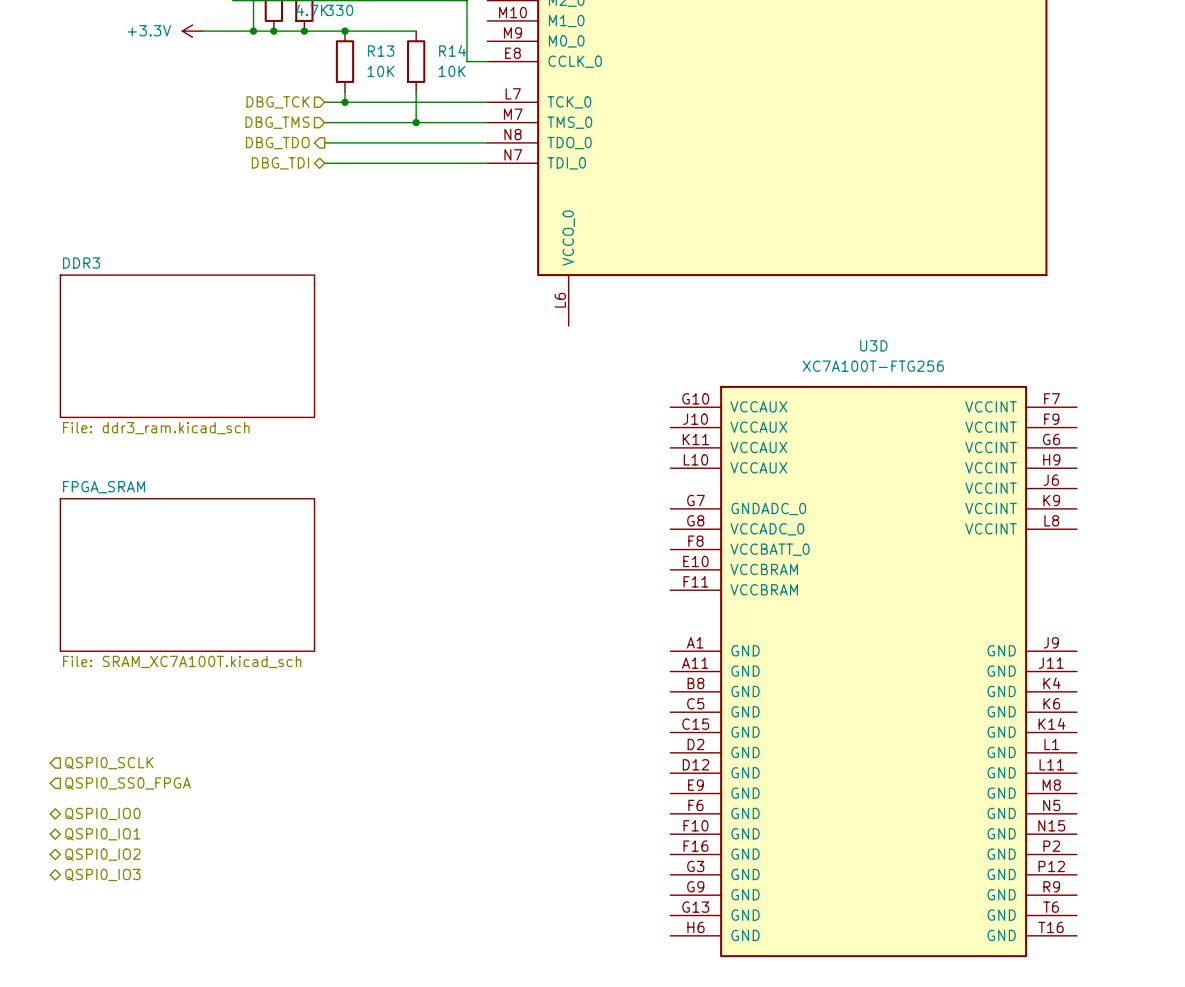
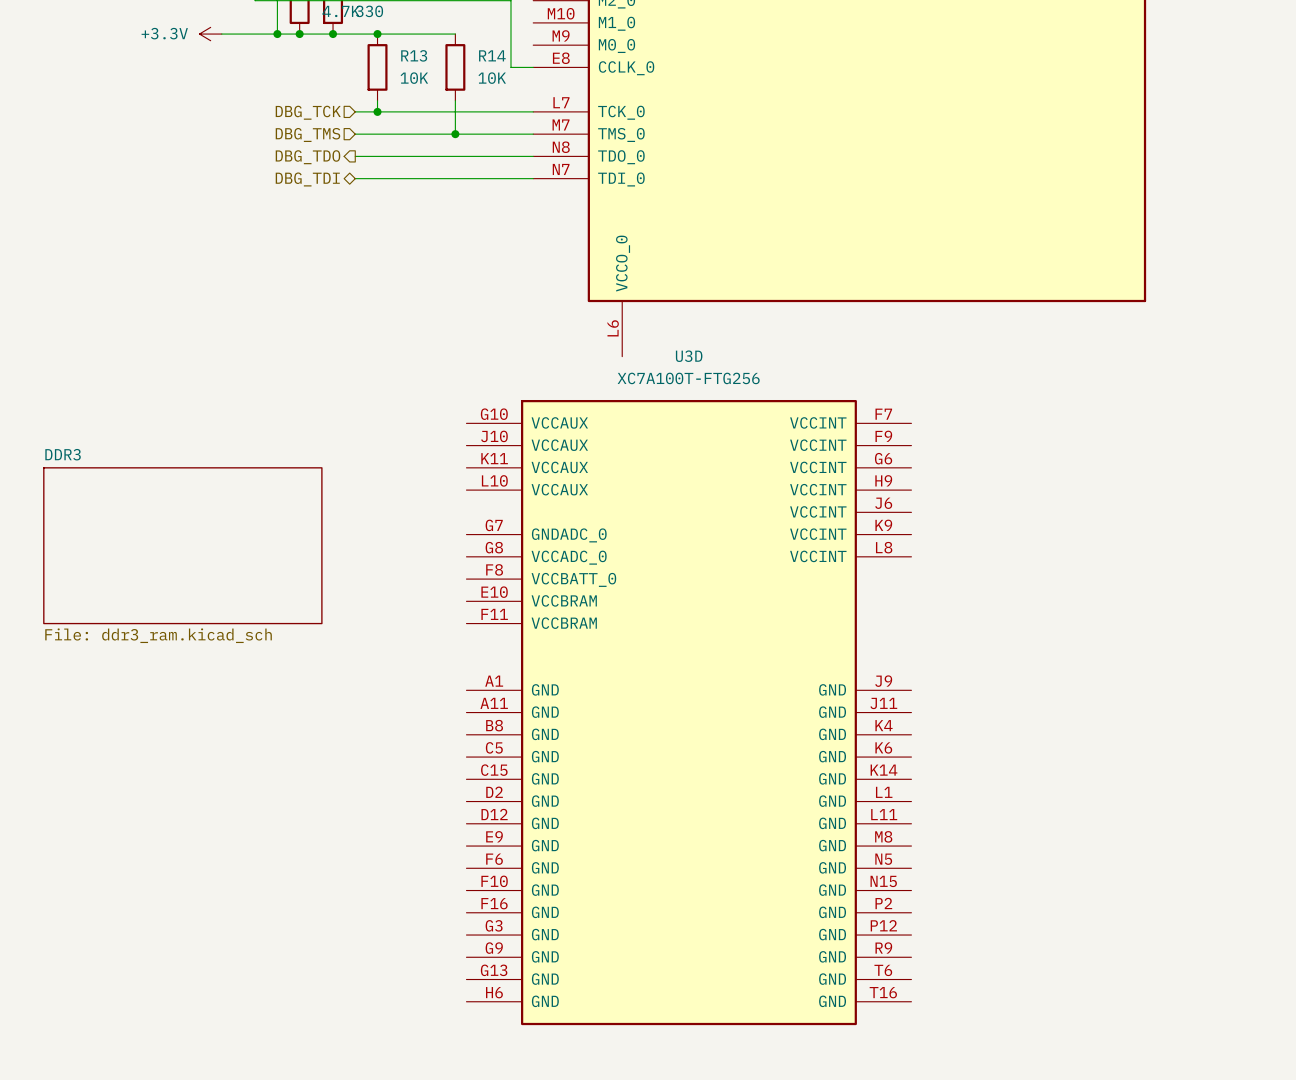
sheet DDR3 position: (187, 346) -> (182, 545)
sheet FPGA_SRAM: File: SRAM_XC7A100T.kicad_sch (187, 574) -> none
U3D position: (873, 671) -> (688, 712)
hierarchical label: QSPI0_SCLK (109, 763) -> none
hierarchical label: QSPI0_SS0_FPGA (128, 783) -> none
hierarchical label: QSPI0_IO0 (102, 813) -> none
hierarchical label: QSPI0_IO1 (102, 834) -> none
hierarchical label: QSPI0_IO2 (102, 854) -> none
hierarchical label: QSPI0_IO3 (102, 874) -> none

